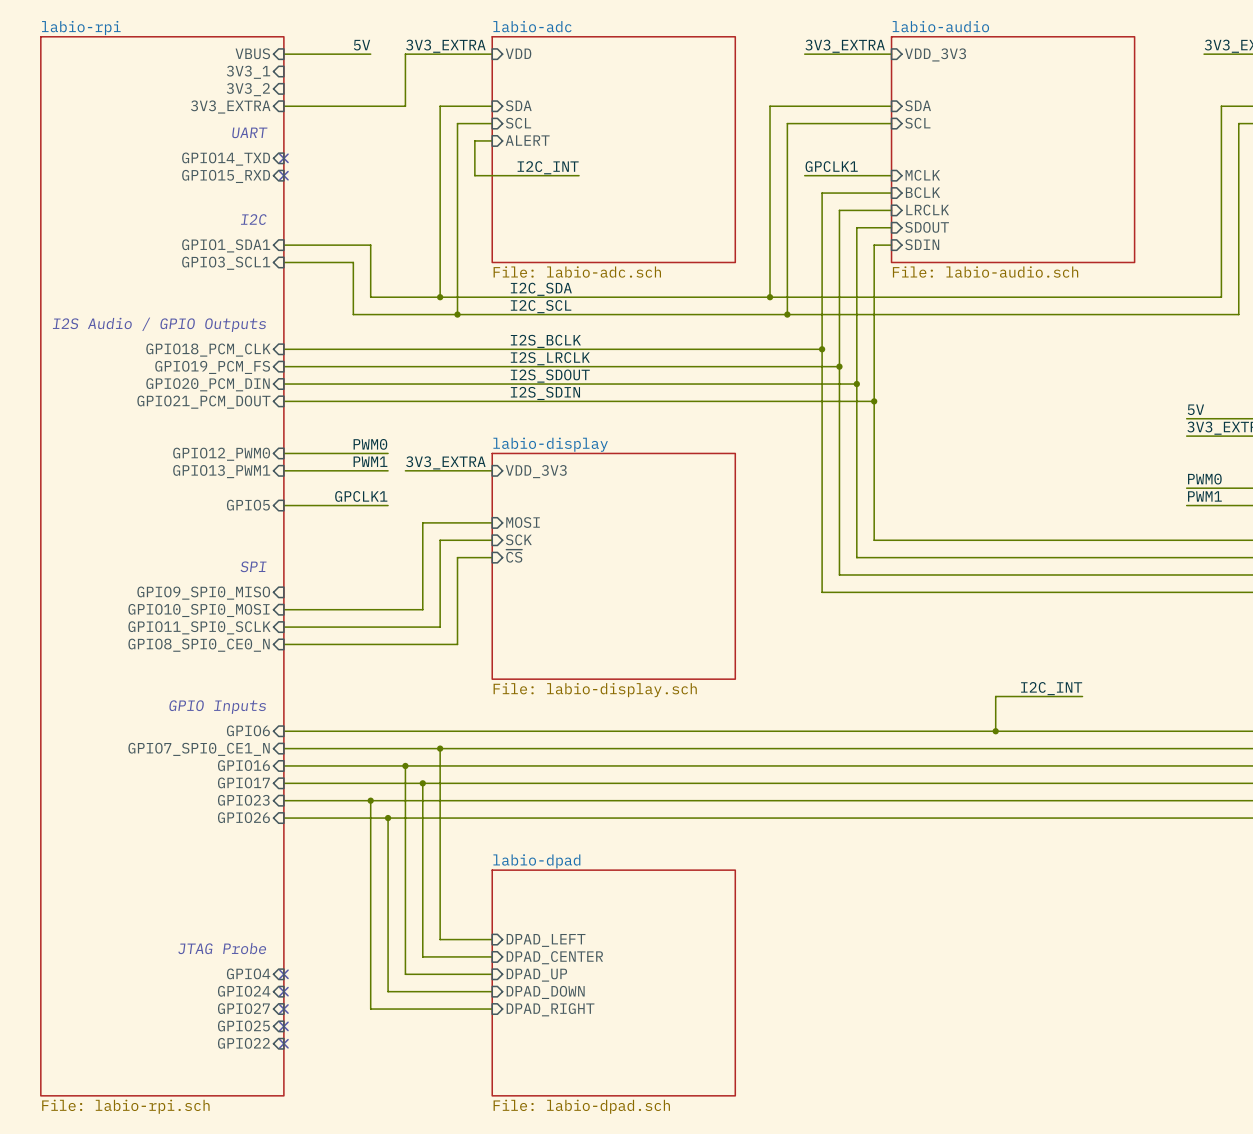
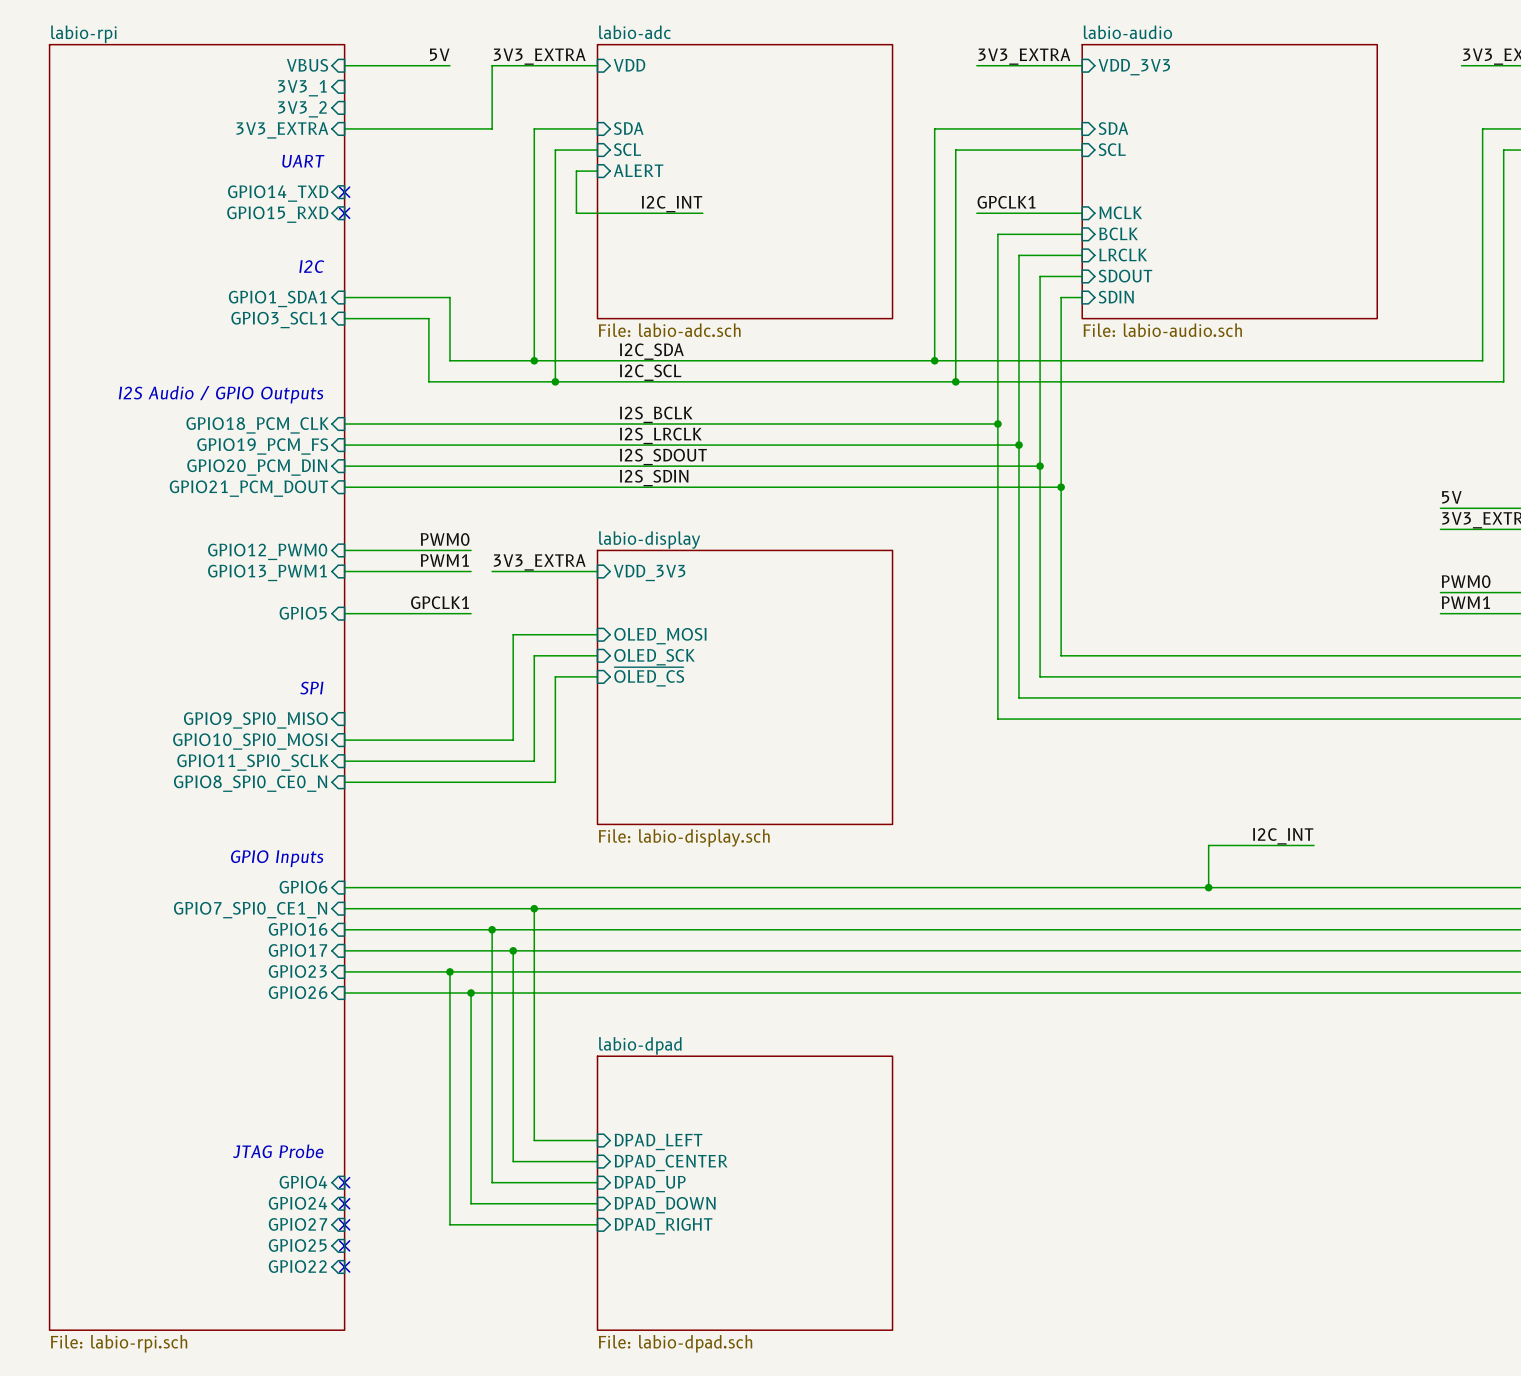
sheet pin: MOSI (523, 522) -> OLED_MOSI (660, 636)
sheet pin: SCK (518, 539) -> OLED_SCK (654, 657)
sheet pin: ~{CS} (514, 556) -> ~{OLED_CS} (649, 676)

